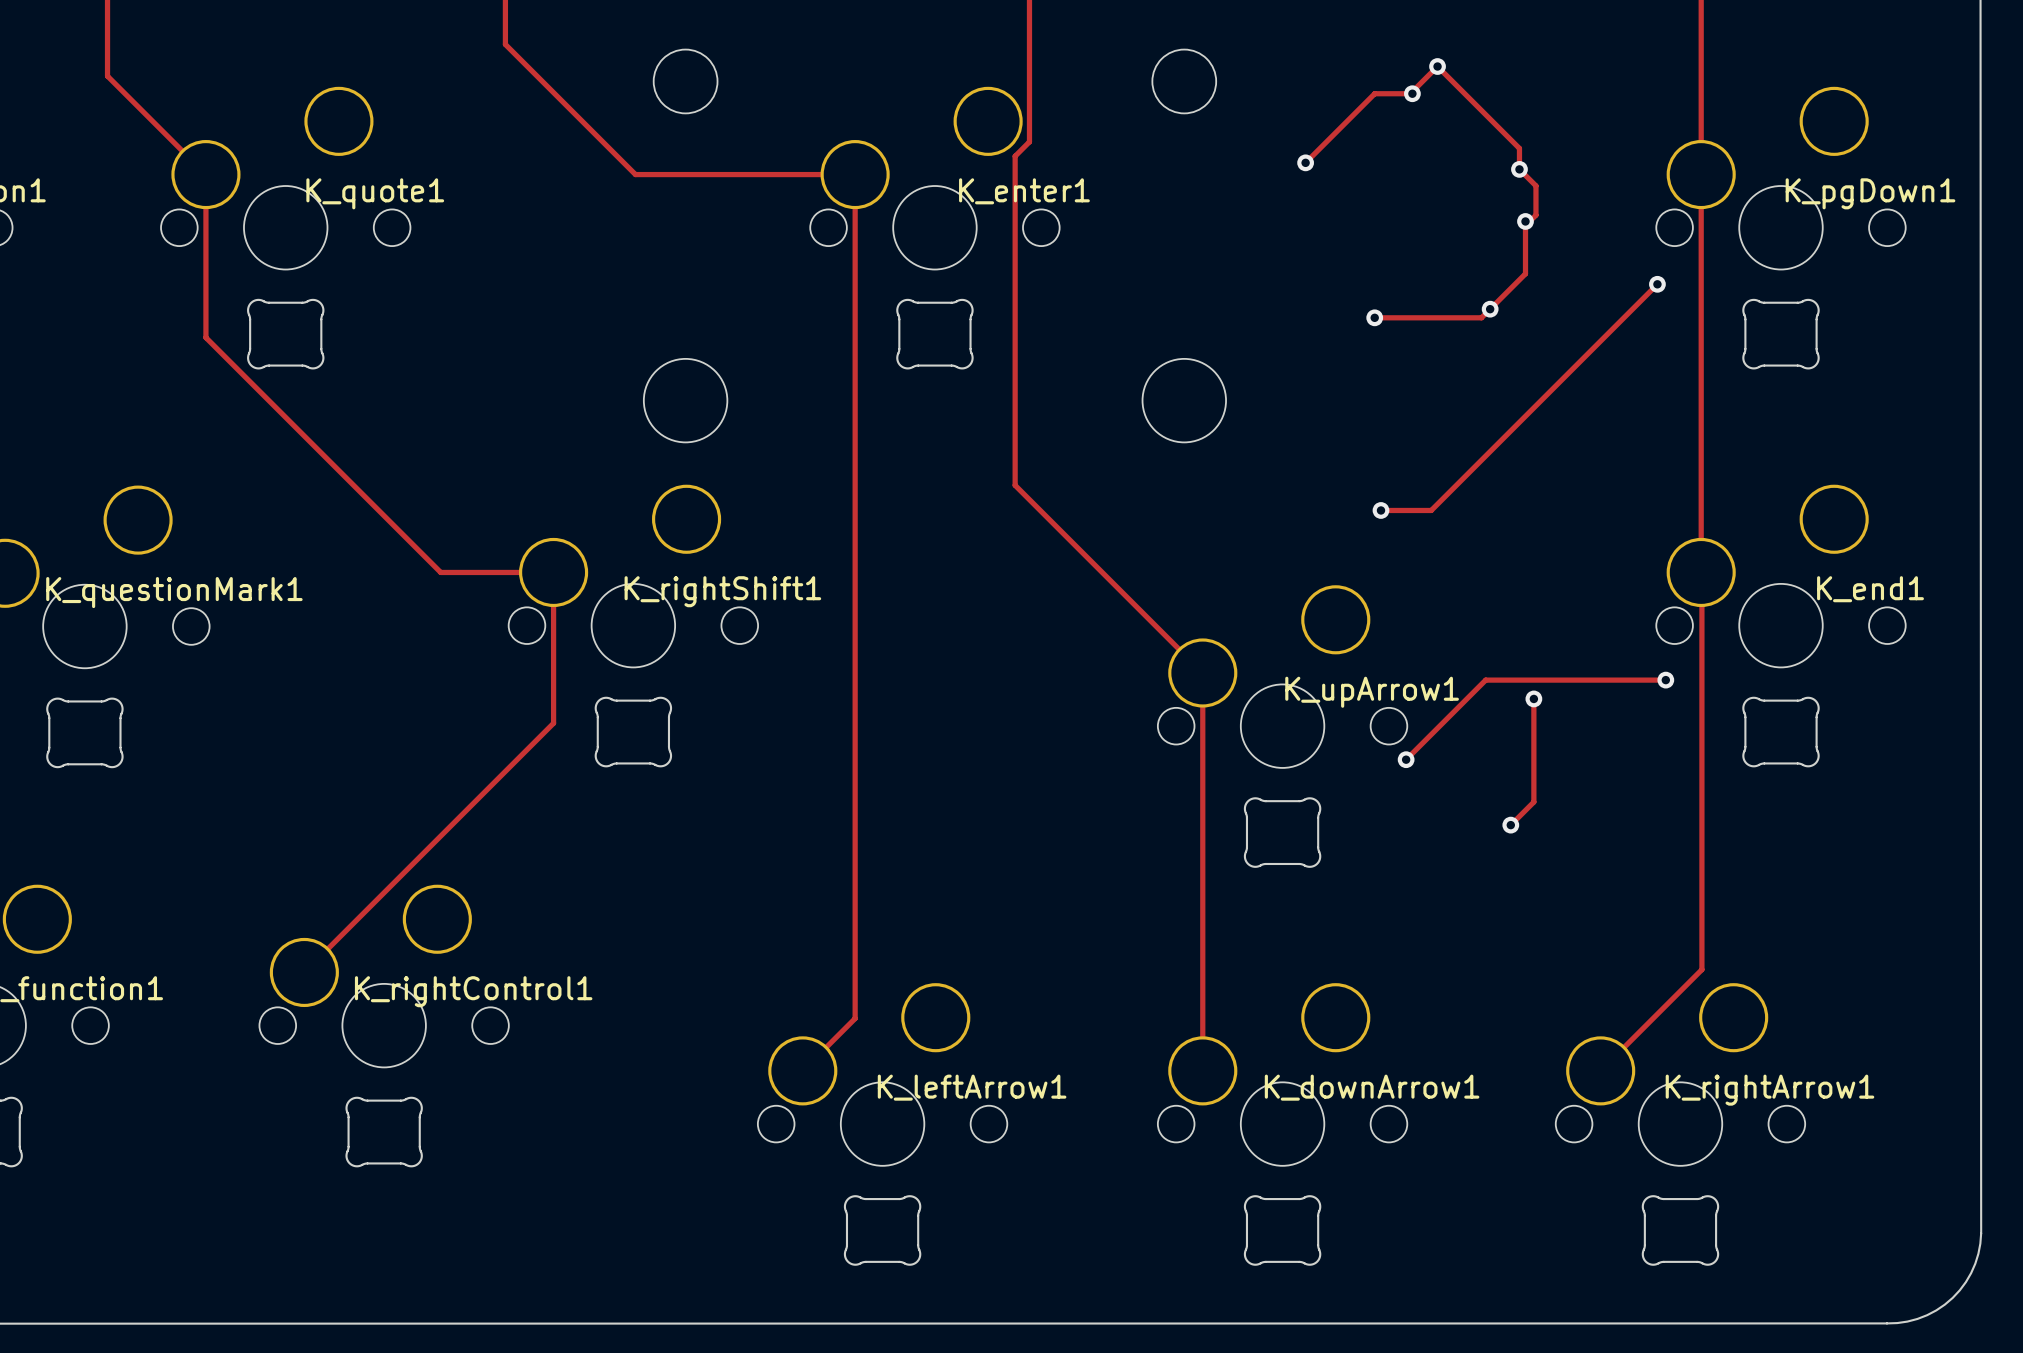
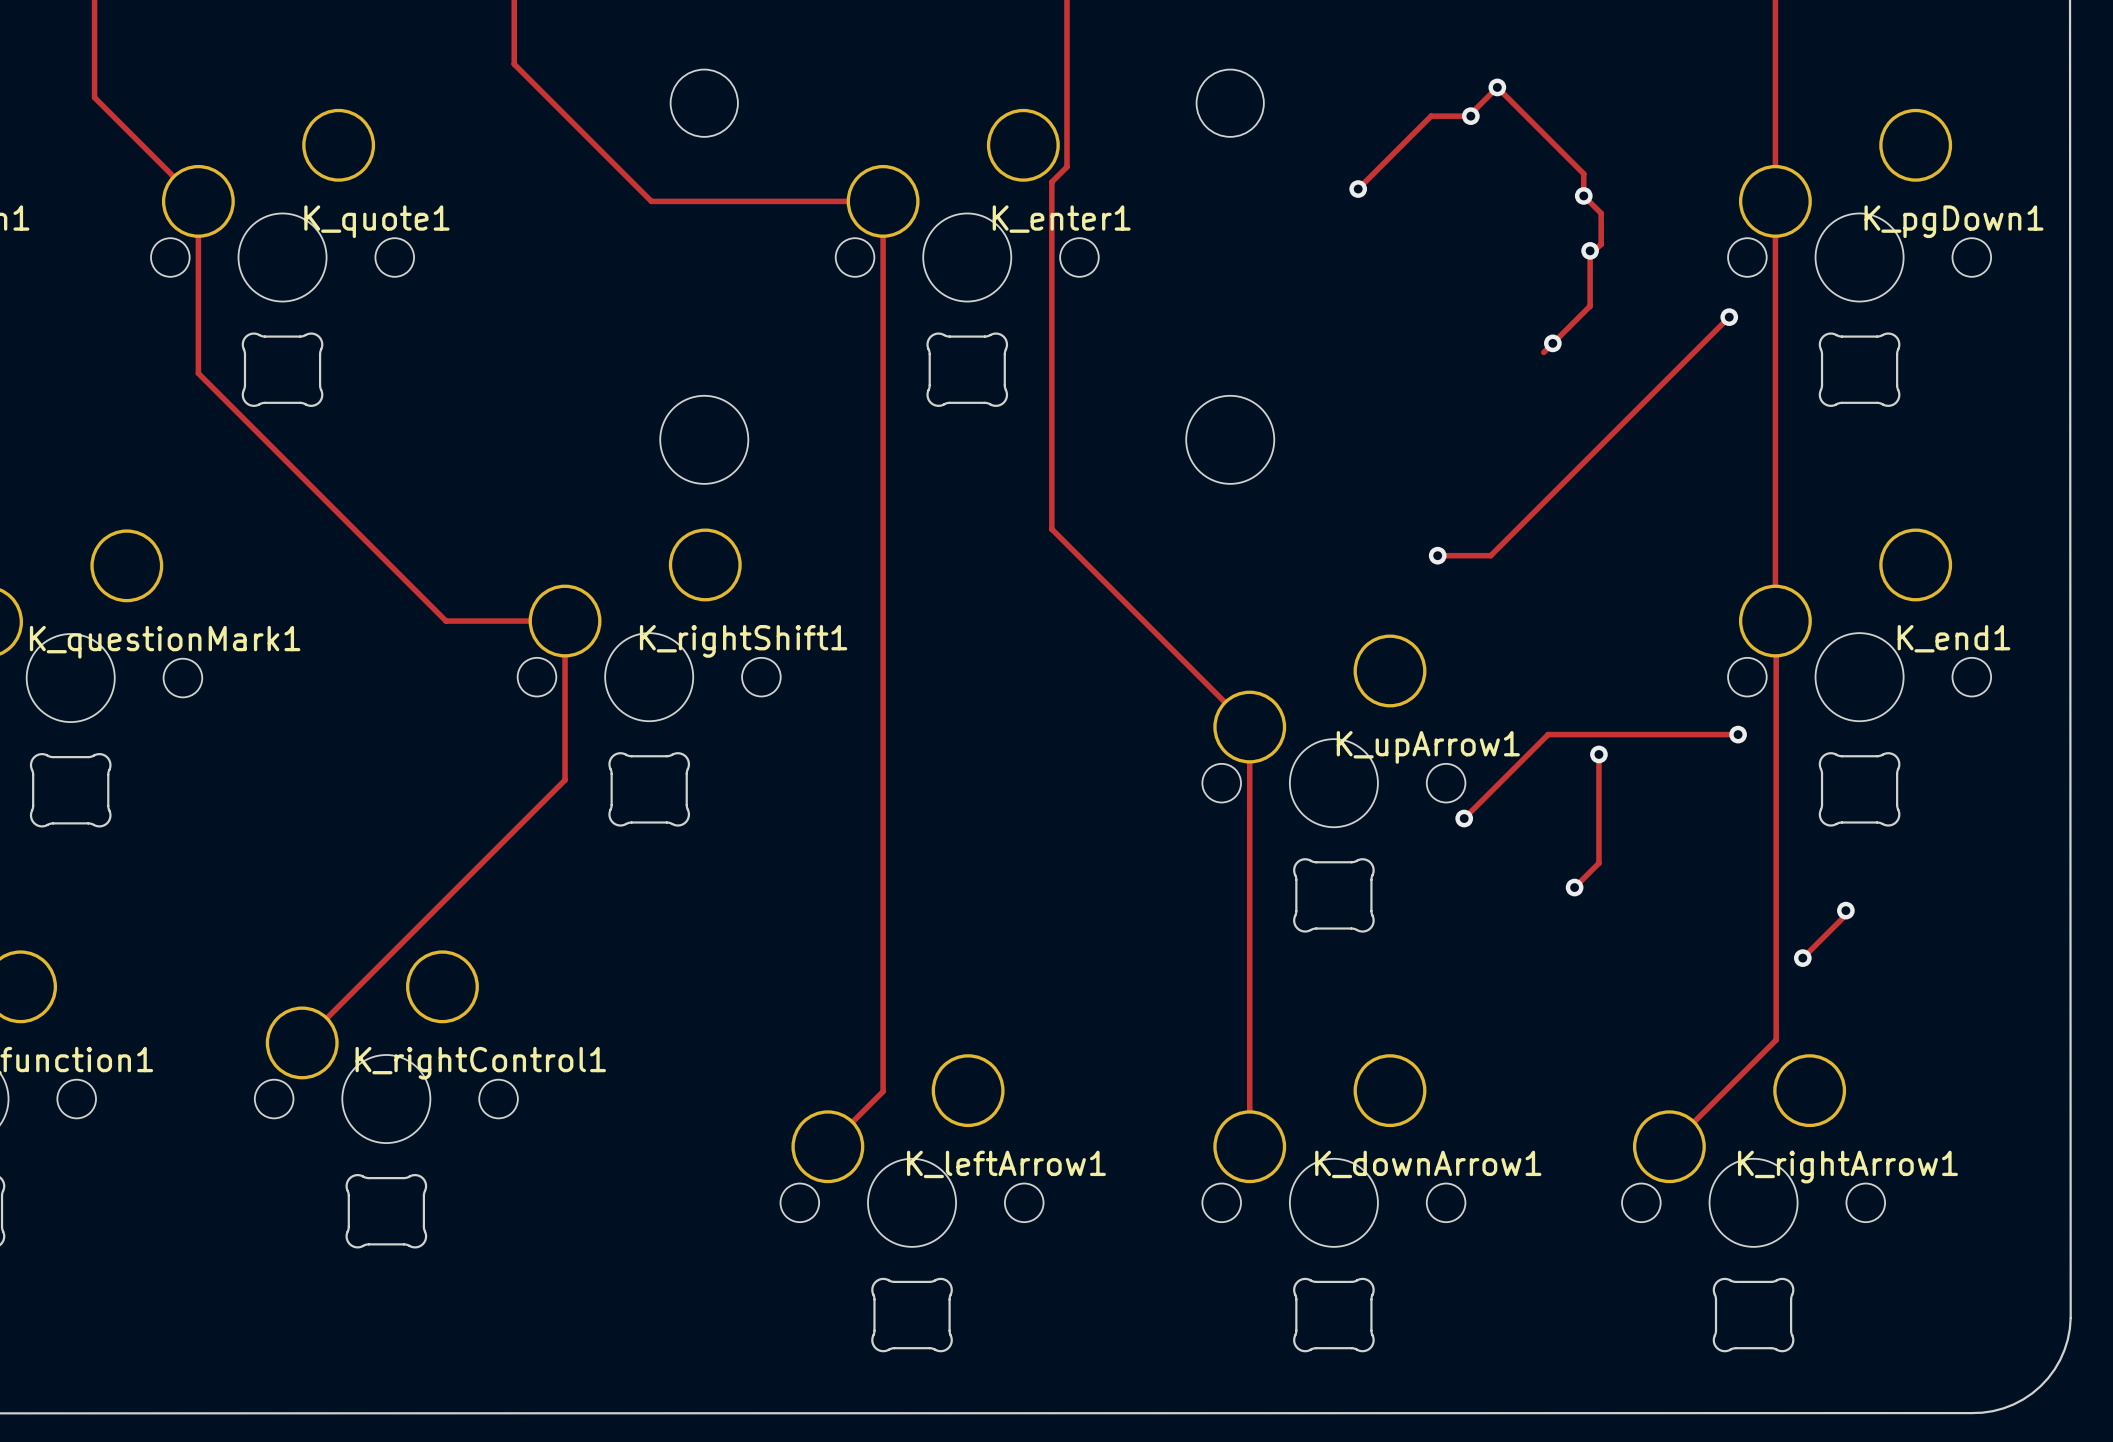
track: (1374, 317) (1481, 317) -> none
via: (1374, 317) -> none
track: none -> (1845, 910) (1845, 915) (1802, 958)
via: none -> (1845, 910)
via: none -> (1802, 958)

